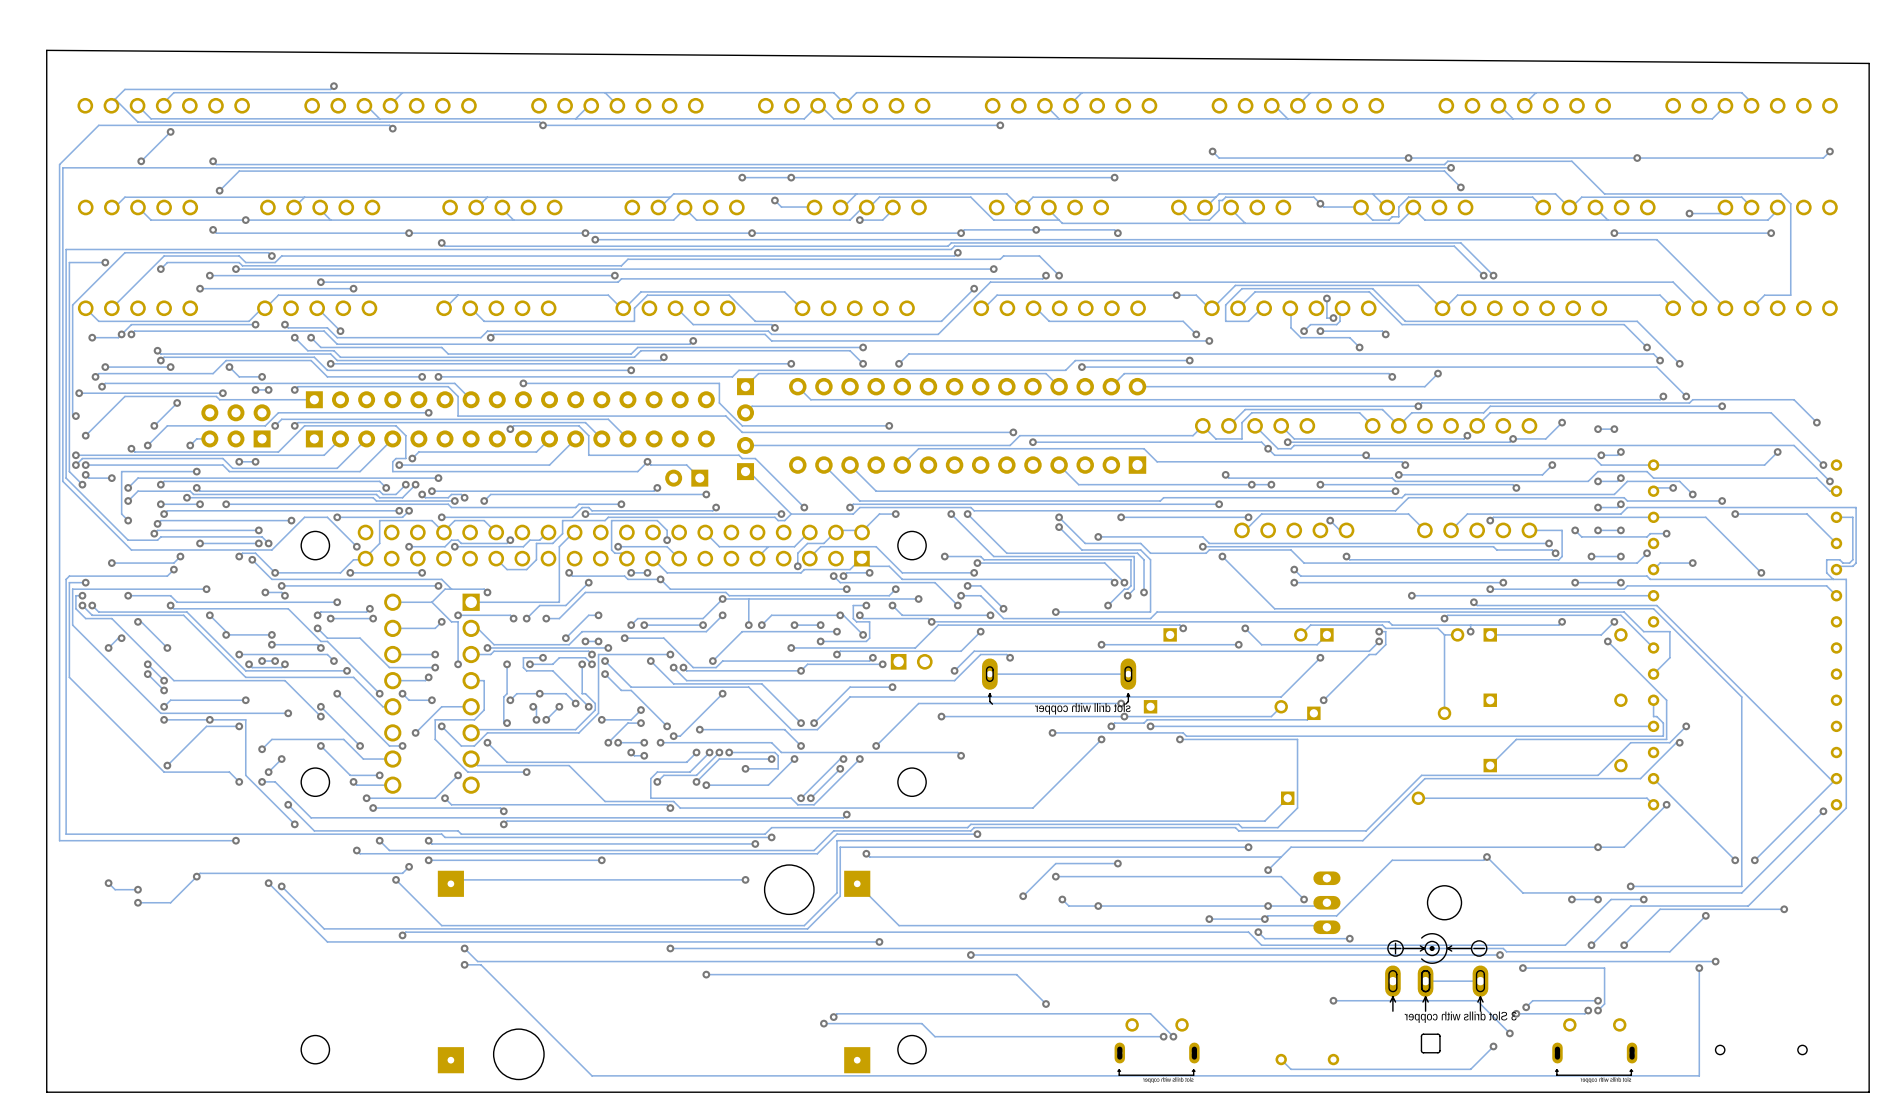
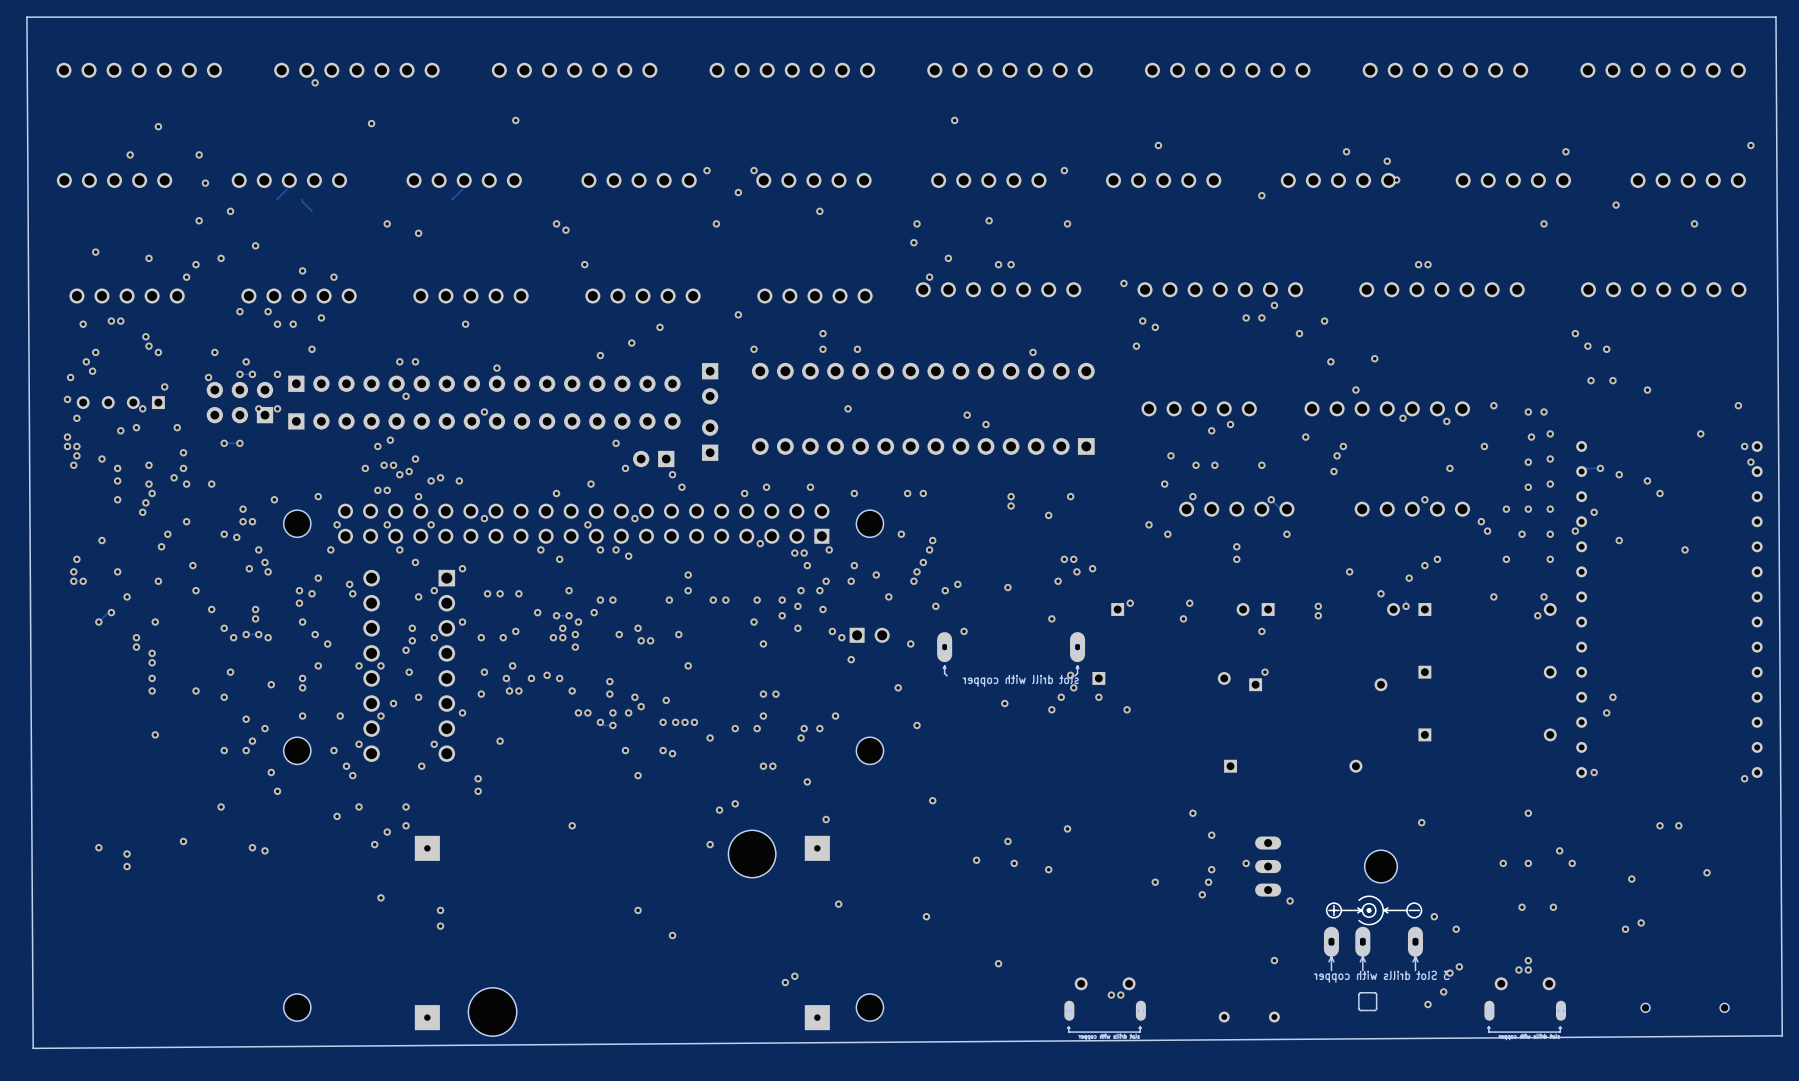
board edge: (46, 50) (46, 1092) (1869, 1092) (1869, 63) (46, 50) -> (1775, 17) (1782, 1035) (33, 1048) (26, 17) (1775, 17)
track: (333, 86) (330, 89) (124, 89) (111, 102) (111, 105) (115, 99) (137, 122) (539, 122) (543, 125) (1000, 125) -> none
track: (402, 92) (390, 105) -> none
track: (605, 92) (617, 105) -> none
track: (1081, 92) (1071, 105) -> none
track: (1310, 92) (1297, 105) -> none
track: (1535, 92) (1524, 105) -> none
part position: (163, 105) -> (139, 70)
track: (364, 105) (379, 118) -> none
part position: (390, 105) -> (356, 70)
track: (591, 105) (588, 105) (575, 118) -> none
part position: (617, 105) -> (574, 70)
part position: (844, 105) -> (792, 70)
track: (1044, 105) (1059, 118) -> none
part position: (1071, 105) -> (1010, 70)
track: (1271, 105) (1274, 105) (1287, 118) -> none
part position: (1297, 105) -> (1227, 70)
track: (1498, 105) (1513, 118) -> none
part position: (1524, 105) -> (1445, 70)
track: (1725, 105) (1712, 118) (833, 118) (820, 105) (818, 105) (804, 118) (151, 118) (137, 105) -> none
track: (1751, 105) (1751, 102) (1741, 92) (856, 92) (844, 105) (843, 102) (833, 92) (173, 92) (164, 102) (163, 105) -> none
part position: (1751, 105) -> (1663, 70)
track: (392, 128) (389, 125) (98, 125) (59, 164) (59, 840) (235, 840) -> none
track: (170, 131) (141, 161) -> none
track: (1829, 151) (1823, 158) (1219, 158) (1212, 151) -> none
track: (213, 161) (216, 164) (1444, 164) (1447, 161) (1571, 161) (1604, 193) (1780, 193) (1790, 203) (1790, 295) (1764, 295) (1751, 308) -> none
track: (1451, 167) (62, 167) (62, 481) (131, 549) (271, 549) (304, 517) (327, 517) (356, 546) -> none
track: (1114, 177) (742, 177) -> none
track: (1460, 187) (1444, 171) (239, 171) (219, 190) -> none
track: (856, 193) (843, 207) (840, 207) -> none
track: (1372, 193) (1387, 207) -> none
track: (670, 197) (124, 197) (115, 207) (111, 207) -> none
track: (1215, 197) (1032, 197) (1022, 207) (1019, 207) (1006, 193) (673, 193) (658, 207) -> none
track: (774, 200) (781, 207) (814, 207) -> none
track: (137, 207) (151, 220) (673, 220) (684, 207) (696, 220) (850, 220) (859, 210) (866, 210) (866, 207) (879, 197) (970, 197) (993, 220) (1059, 220) -> none
part position: (137, 207) -> (114, 180)
part position: (320, 207) -> (289, 180)
track: (502, 207) (513, 220) -> none
part position: (502, 207) -> (464, 180)
part position: (684, 207) -> (639, 180)
part position: (866, 207) -> (813, 180)
track: (892, 207) (882, 220) (859, 220) -> none
part position: (1048, 207) -> (988, 180)
track: (1231, 207) (1245, 223) -> none
part position: (1231, 207) -> (1163, 180)
part position: (1413, 207) -> (1338, 180)
track: (1543, 207) (1532, 197) (1408, 197) (1398, 207) (1398, 216) (1392, 216) (1388, 220) (1372, 220) (1359, 207) (1323, 207) (1313, 197) (1225, 197) (1219, 200) (1219, 210) (1209, 220) (1189, 220) (1178, 207) -> none
track: (1595, 207) (1607, 220) -> none
part position: (1595, 207) -> (1513, 180)
track: (1725, 207) (1722, 213) (1689, 213) -> none
track: (1751, 207) (1741, 197) (1581, 197) (1569, 207) (1555, 193) (1219, 193) (1204, 207) -> none
track: (1777, 207) (1777, 210) (1767, 220) (1424, 220) (1413, 207) (1398, 223) (1062, 223) (1049, 210) (1048, 207) -> none
part position: (1777, 207) -> (1688, 180)
track: (213, 229) (216, 233) (961, 233) (964, 229) (1114, 229) (1117, 233) -> none
track: (1771, 233) (1614, 233) -> none
track: (595, 239) (1656, 239) (1725, 308) -> none
track: (441, 242) (445, 246) (948, 246) (951, 242) (1460, 242) (1493, 275) -> none
track: (957, 252) (954, 256) (281, 256) (275, 262) (245, 262) (239, 256) (164, 256) (111, 308) -> none
track: (271, 256) (268, 252) (124, 252) (72, 305) (72, 416) (75, 416) -> none
track: (105, 262) (69, 262) (69, 471) (82, 484) -> none
track: (160, 269) (167, 262) (239, 262) (242, 265) (621, 265) (627, 259) (1000, 259) (1003, 256) (1039, 256) (1059, 275) -> none
track: (993, 269) (235, 269) -> none
track: (614, 275) (209, 275) -> none
track: (1046, 275) (1042, 278) (621, 278) (618, 282) (320, 282) -> none
track: (1483, 275) (1454, 246) (954, 246) (951, 249) (66, 249) (66, 478) (128, 540) (157, 540) (160, 536) (262, 536) (268, 543) -> none
track: (353, 288) (200, 288) -> none
track: (974, 288) (941, 321) (755, 321) (729, 295) (647, 295) (634, 308) (634, 321) (484, 321) (470, 308) -> none
track: (458, 295) (444, 308) -> none
track: (1326, 298) (1326, 318) (1333, 318) -> none
track: (317, 308) (340, 331) -> none
track: (675, 308) (693, 324) (771, 324) (774, 327) -> none
track: (802, 308) (784, 291) (641, 291) (624, 308) (621, 308) (608, 295) (278, 295) (249, 321) (98, 321) (85, 308) -> none
track: (1033, 308) (1036, 308) (1049, 321) (1183, 321) (1196, 334) -> none
part position: (1059, 308) -> (998, 289)
track: (1238, 308) (1255, 291) (1369, 291) (1402, 324) (1624, 324) (1647, 347) -> none
track: (1264, 308) (1261, 308) (1248, 321) (1225, 321) (1225, 305) (1242, 288) (1372, 288) (1405, 321) (1637, 321) (1679, 363) -> none
track: (1290, 308) (1291, 327) (1300, 337) (1349, 337) (1359, 347) -> none
part position: (1290, 308) -> (1220, 289)
track: (1342, 308) (1340, 308) (1340, 321) (1336, 324) (1310, 324) (1304, 331) -> none
part position: (1520, 308) -> (1441, 289)
track: (1673, 308) (1660, 295) (1457, 295) (1444, 308) (1441, 308) (1418, 285) (1235, 285) (1212, 308) (1209, 308) (1196, 295) (997, 295) (983, 308) (981, 308) -> none
track: (1699, 308) (1673, 282) (990, 282) (938, 334) (771, 334) (768, 331) (487, 331) (480, 337) (337, 337) (327, 327) (288, 327) (284, 324) -> none
part position: (1751, 308) -> (1663, 289)
track: (255, 324) (131, 324) (118, 337) (92, 337) -> none
track: (1320, 331) (1382, 331) (1385, 334) -> none
track: (131, 334) (134, 331) (324, 331) (337, 344) (689, 344) (693, 340) -> none
track: (294, 337) (307, 350) (333, 350) (340, 357) (634, 357) (641, 350) (850, 350) (863, 363) -> none
track: (311, 337) (320, 347) (441, 347) (448, 354) (631, 354) (637, 347) (863, 347) -> none
track: (490, 337) (494, 334) (765, 334) (771, 340) (1209, 340) -> none
track: (157, 350) (160, 354) (330, 354) (337, 360) (660, 360) (663, 357) -> none
track: (160, 360) (164, 357) (314, 357) (327, 370) (631, 370) -> none
track: (1189, 360) (1075, 360) (1065, 370) (738, 370) (732, 376) (438, 376) -> none
track: (1660, 360) (1653, 354) (908, 354) (899, 363) -> none
track: (791, 363) (330, 363) -> none
track: (170, 367) (105, 367) -> none
track: (229, 367) (239, 376) (262, 376) -> none
track: (1081, 367) (1656, 367) (1686, 396) -> none
track: (1437, 373) (1424, 386) (1137, 386) -> none
track: (422, 376) (327, 376) (311, 360) (226, 360) (213, 373) (98, 373) (95, 376) -> none
track: (1392, 376) (1388, 373) (1124, 373) (1111, 386) -> none
track: (523, 383) (719, 383) (719, 403) (742, 425) (889, 425) -> none
track: (102, 386) (105, 383) (454, 383) (471, 399) -> none
track: (797, 386) (810, 399) (1660, 399) (1663, 396) -> none
track: (1059, 386) (1046, 373) (758, 373) (745, 386) -> none
track: (294, 389) (298, 386) (448, 386) (458, 396) (458, 416) (725, 416) (742, 432) (1013, 432) -> none
track: (222, 393) (79, 393) -> none
track: (314, 399) (219, 399) (216, 396) (124, 396) (85, 435) -> none
track: (177, 403) (154, 425) -> none
track: (1722, 406) (1490, 406) (1483, 412) (1411, 412) (1398, 425) (1382, 409) (1245, 409) (1228, 425) -> none
track: (428, 412) (278, 412) (265, 425) (167, 425) (147, 445) -> none
track: (745, 412) (752, 406) (1418, 406) (1421, 403) (1689, 403) (1692, 399) (1794, 399) (1816, 422) -> none
part: none -> (120, 402)
track: (1562, 422) (1545, 438) (1513, 438) (1509, 442) (1287, 442) -> none
part position: (235, 425) -> (239, 402)
track: (275, 425) (281, 419) (608, 419) (627, 438) -> none
track: (294, 425) (298, 422) (585, 422) (601, 438) -> none
track: (1255, 425) (1277, 448) (1291, 448) (1294, 445) (1794, 445) (1829, 481) -> none
track: (1281, 425) (1294, 438) (1464, 438) (1467, 435) -> none
track: (1372, 425) (1359, 412) (1251, 412) (1242, 422) (1242, 438) (1215, 438) (1202, 425) (1193, 435) (1019, 435) (1010, 445) (745, 445) -> none
track: (1477, 425) (1490, 412) (1771, 412) (1823, 465) -> none
track: (510, 429) (513, 425) (578, 425) (588, 435) (588, 455) (738, 455) (742, 458) (755, 458) (804, 507) -> none
track: (1614, 429) (1598, 429) -> none
track: (209, 438) (196, 438) (190, 445) -> none
track: (340, 438) (324, 455) (75, 455) -> none
track: (366, 438) (337, 468) (232, 468) (222, 458) (82, 458) (75, 465) -> none
track: (392, 438) (360, 471) (229, 471) (222, 465) (85, 465) -> none
track: (549, 438) (536, 452) (418, 452) (412, 458) -> none
track: (575, 438) (549, 465) (399, 465) -> none
track: (1032, 442) (1261, 442) (1274, 455) (1366, 455) (1369, 458) (1594, 458) (1601, 465) (1764, 465) (1777, 452) -> none
track: (131, 448) (134, 452) (278, 452) (304, 425) (396, 425) (405, 435) (405, 458) (396, 458) (392, 461) (392, 471) (637, 471) (647, 461) (650, 465) (686, 465) (699, 478) -> none
track: (1620, 452) (1617, 455) (1601, 455) -> none
track: (823, 465) (859, 500) (1160, 500) (1163, 497) (1402, 497) (1405, 494) (1614, 494) (1627, 481) (1679, 481) (1692, 494) -> none
track: (850, 465) (876, 491) (1395, 491) -> none
track: (1059, 465) (1078, 484) (1271, 484) -> none
track: (1405, 465) (1402, 461) (1157, 461) (1144, 448) (918, 448) (902, 465) -> none
track: (1552, 465) (1542, 474) (1398, 474) -> none
track: (196, 471) (121, 471) (121, 514) (128, 520) -> none
track: (745, 471) (748, 471) (791, 514) -> none
track: (85, 474) (88, 478) (111, 478) -> none
track: (1225, 474) (1228, 478) (1392, 478) (1395, 481) (1588, 481) (1598, 471) (1647, 471) (1653, 478) (1816, 478) (1829, 491) (1836, 491) -> none
track: (438, 478) (137, 478) (128, 487) -> none
track: (1620, 478) (1617, 481) (1598, 481) -> none
track: (160, 484) (164, 481) (379, 481) (386, 487) -> none
track: (405, 484) (396, 494) (382, 494) (379, 491) (200, 491) (196, 487) -> none
track: (415, 484) (402, 497) (379, 497) (376, 494) (193, 494) (190, 491) (137, 491) (128, 500) -> none
track: (1320, 484) (1513, 484) (1516, 487) -> none
track: (657, 487) (654, 491) (431, 491) -> none
track: (422, 494) (425, 497) (448, 497) (451, 494) (461, 494) (464, 497) -> none
track: (706, 494) (490, 494) (484, 500) -> none
track: (186, 497) (373, 497) (376, 500) (454, 500) -> none
track: (1722, 500) (1627, 500) (1624, 497) (1408, 497) (1395, 510) (974, 510) (970, 507) (859, 507) (853, 514) (791, 514) -> none
track: (200, 504) (160, 504) -> none
track: (621, 504) (578, 504) (575, 507) (451, 507) (448, 504) (226, 504) -> none
track: (1219, 504) (853, 504) (850, 507) -> none
track: (1620, 504) (1617, 507) (1598, 507) -> none
track: (716, 507) (712, 510) (592, 510) (588, 507) (582, 507) (572, 517) (441, 517) -> none
track: (399, 510) (167, 510) (164, 514) -> none
track: (409, 510) (402, 517) (337, 517) -> none
track: (781, 514) (585, 514) -> none
track: (791, 514) (784, 520) (778, 520) (774, 517) (608, 517) (605, 520) (562, 520) (562, 533) (552, 543) (536, 543) (536, 559) (526, 569) (507, 569) (496, 558) -> none
track: (895, 514) (879, 514) (862, 532) (859, 530) (836, 530) (823, 543) (807, 543) (797, 553) (797, 566) -> none
track: (951, 514) (993, 556) (1134, 556) (1134, 589) (1127, 595) -> none
track: (967, 514) (1006, 553) (1137, 553) (1144, 559) (1144, 592) -> none
track: (1735, 514) (1807, 514) (1836, 543) -> none
track: (1059, 517) (1085, 543) (1140, 543) (1150, 553) (1206, 553) (1209, 549) (1291, 549) (1304, 563) (1637, 563) (1647, 553) -> none
track: (1248, 517) (1121, 517) -> none
track: (1836, 517) (1852, 517) (1852, 559) (1849, 563) (1843, 563) (1839, 559) (1826, 559) (1826, 572) (1833, 579) -> none
track: (291, 520) (160, 520) (157, 523) -> none
track: (1490, 520) (1493, 517) (1705, 517) (1761, 572) -> none
track: (1059, 527) (1081, 549) (1140, 549) (1150, 559) (1150, 612) (1055, 612) -> none
track: (258, 530) (157, 530) (154, 533) -> none
track: (1424, 530) (1408, 514) (1261, 514) (1245, 530) (1242, 530) -> none
track: (1451, 530) (1467, 514) (1620, 514) (1627, 507) (1856, 507) (1856, 563) (1852, 566) (1839, 566) (1836, 569) -> none
track: (1529, 530) (1562, 530) (1562, 556) (1558, 559) (1349, 559) (1346, 556) -> none
track: (1575, 530) (1581, 536) (1647, 536) (1650, 533) (1666, 533) -> none
track: (1620, 530) (1598, 530) -> none
track: (496, 532) (484, 520) (454, 520) (443, 532) (431, 520) (379, 520) (379, 543) (365, 558) (353, 559) (340, 572) (275, 572) (255, 553) (242, 553) (239, 556) -> none
track: (548, 532) (539, 540) (529, 540) (523, 546) (454, 546) -> none
track: (574, 532) (559, 546) (559, 602) (471, 602) -> none
track: (809, 532) (794, 546) (719, 546) (705, 532) -> none
track: (1098, 536) (1202, 536) (1209, 543) (1549, 543) -> none
track: (510, 540) (507, 543) (461, 543) (458, 540) (451, 540) (445, 546) (409, 546) -> none
track: (667, 540) (667, 530) (657, 520) (611, 520) (611, 549) (614, 553) (621, 553) (626, 558) -> none
track: (258, 543) (200, 543) -> none
track: (618, 546) (667, 546) (679, 558) -> none
track: (768, 546) (757, 558) -> none
track: (1202, 546) (1493, 546) (1496, 549) (1552, 549) (1555, 553) -> none
track: (180, 556) (173, 563) (111, 563) -> none
track: (944, 556) (980, 556) (983, 559) (1130, 559) (1130, 585) (1124, 589) (1108, 605) -> none
track: (1222, 556) (1274, 608) (1653, 608) (1741, 696) (1741, 886) (1630, 886) -> none
track: (1620, 556) (1591, 556) -> none
track: (653, 558) (667, 572) (801, 572) (804, 569) (850, 569) (861, 558) (869, 566) (889, 566) (902, 579) (1111, 579) (1114, 582) -> none
track: (809, 558) (820, 546) (876, 546) (902, 572) (974, 572) -> none
track: (252, 559) (271, 579) (441, 579) (451, 589) -> none
track: (977, 563) (1104, 563) (1124, 582) -> none
track: (1692, 563) (1660, 563) (1653, 569) -> none
track: (173, 569) (167, 576) (69, 576) (66, 579) (66, 834) (441, 834) (445, 837) (771, 837) -> none
track: (1294, 569) (1300, 576) (1647, 576) (1650, 579) (1846, 579) (1846, 808) (1748, 906) (1630, 906) (1591, 945) -> none
track: (422, 572) (350, 572) -> none
track: (569, 572) (572, 576) (624, 576) (627, 579) (660, 579) (670, 589) (846, 589) -> none
track: (647, 572) (631, 572) -> none
track: (869, 572) (846, 572) (843, 576) -> none
track: (833, 576) (840, 582) (934, 582) (957, 605) -> none
track: (85, 582) (69, 582) (69, 677) (164, 772) (229, 772) (239, 781) -> none
track: (588, 582) (565, 605) (539, 605) (526, 618) -> none
track: (1503, 582) (1294, 582) -> none
track: (1620, 582) (1575, 582) -> none
track: (438, 585) (281, 585) -> none
track: (967, 585) (980, 585) (1003, 608) -> none
track: (206, 589) (72, 589) (72, 625) (160, 713) (288, 713) -> none
track: (895, 589) (889, 595) (729, 595) (725, 592) (585, 592) (559, 618) (546, 618) -> none
track: (1490, 589) (1624, 589) (1627, 585) (1826, 585) (1836, 595) -> none
track: (265, 592) (281, 592) (284, 595) -> none
track: (487, 592) (484, 589) (445, 589) (431, 602) -> none
track: (82, 595) (75, 595) (75, 608) (85, 618) (111, 618) (173, 680) (284, 680) (320, 716) -> none
track: (128, 595) (170, 595) (177, 602) (337, 602) -> none
track: (961, 595) (980, 595) (1003, 618) (1150, 618) (1157, 612) (1624, 612) (1643, 631) (1669, 631) (1669, 657) (1653, 674) -> none
track: (1653, 595) (1411, 595) -> none
track: (748, 598) (748, 625) -> none
track: (918, 598) (722, 598) (703, 618) (637, 618) (631, 625) -> none
track: (431, 602) (392, 602) -> none
track: (431, 602) (451, 621) (458, 621) (458, 664) -> none
track: (1473, 602) (1477, 605) (1656, 605) (1833, 781) -> none
track: (82, 605) (92, 615) (183, 615) (245, 677) (353, 677) (382, 706) (392, 706) -> none
track: (92, 605) (98, 612) (186, 612) (245, 670) (347, 670) -> none
track: (170, 605) (173, 608) (288, 608) (320, 641) (327, 641) (379, 693) -> none
track: (866, 605) (853, 605) (853, 618) (856, 621) (869, 621) (869, 638) (866, 641) (820, 641) -> none
track: (892, 605) (902, 615) (990, 615) -> none
track: (369, 608) (366, 612) (320, 612) (317, 615) -> none
track: (209, 615) (229, 634) -> none
track: (458, 615) (510, 615) (513, 618) -> none
track: (598, 615) (588, 615) (565, 638) -> none
track: (722, 615) (706, 631) (582, 631) (569, 644) (494, 644) (477, 628) (471, 628) -> none
track: (859, 615) (863, 618) (928, 618) (931, 621) (1388, 621) (1392, 625) (1558, 625) (1562, 621) -> none
track: (373, 618) (330, 618) -> none
track: (1444, 618) (1447, 615) (1620, 615) (1653, 647) -> none
track: (137, 621) (141, 621) (167, 647) -> none
track: (441, 621) (435, 628) (392, 628) -> none
track: (1614, 621) (1601, 634) (1490, 634) -> none
track: (703, 625) (644, 625) -> none
track: (761, 625) (771, 615) (843, 615) (863, 634) -> none
track: (820, 625) (794, 625) -> none
track: (317, 628) (327, 638) (360, 638) (389, 667) (435, 667) -> none
track: (1183, 628) (1179, 625) (938, 625) (915, 647) (791, 647) -> none
track: (1245, 628) (1261, 644) (1317, 644) (1326, 634) -> none
track: (836, 631) (742, 631) (712, 661) -> none
track: (980, 631) (961, 651) (840, 651) (836, 654) -> none
track: (1379, 631) (1385, 631) (1385, 644) (1375, 654) (1369, 654) (1323, 700) -> none
track: (271, 634) (226, 634) -> none
track: (1444, 634) (1444, 713) -> none
track: (1444, 634) (1437, 628) (1385, 628) (1382, 625) (1310, 625) (1300, 634) -> none
track: (1457, 634) (1444, 634) -> none
track: (624, 638) (663, 638) (693, 667) (716, 667) (722, 661) (869, 661) (872, 657) -> none
track: (1379, 641) (1369, 651) (974, 651) (954, 670) -> none
track: (1607, 641) (1666, 700) (1666, 739) (1516, 739) (1490, 765) -> none
track: (271, 644) (317, 644) (320, 647) -> none
track: (1238, 644) (1101, 644) -> none
track: (608, 647) (487, 647) -> none
track: (239, 654) (327, 654) (333, 661) -> none
track: (435, 654) (392, 654) -> none
track: (592, 654) (588, 651) (494, 651) (490, 654) (471, 654) -> none
track: (670, 654) (598, 654) (598, 713) (578, 732) (487, 732) (474, 745) (461, 745) (441, 726) -> none
track: (543, 657) (523, 657) (523, 667) (526, 670) (552, 670) (588, 706) -> none
track: (1010, 657) (1006, 654) (980, 654) (954, 680) (686, 680) (673, 667) -> none
track: (1320, 657) (1281, 696) (850, 696) (817, 729) (791, 729) (748, 687) (631, 687) (605, 661) -> none
track: (650, 661) (673, 683) (761, 683) (801, 723) -> none
track: (147, 664) (164, 680) -> none
track: (284, 664) (281, 667) (252, 667) (249, 664) -> none
track: (507, 664) (507, 693) (503, 696) (503, 723) (507, 723) -> none
track: (582, 664) (582, 693) (585, 693) (595, 703) (595, 710) (575, 729) (474, 729) (471, 732) -> none
track: (592, 664) (585, 657) (559, 657) (552, 664) (529, 664) -> none
track: (882, 664) (807, 664) (801, 670) (686, 670) (683, 667) -> none
track: (147, 674) (164, 690) -> none
track: (605, 674) (621, 690) (631, 690) (667, 726) -> none
track: (1128, 674) (989, 674) -> none
track: (428, 677) (425, 680) (392, 680) -> none
track: (471, 680) (484, 680) (484, 710) (474, 719) (435, 719) (435, 739) (467, 772) (526, 772) -> none
track: (892, 687) (850, 687) (814, 723) -> none
track: (337, 693) (389, 745) (402, 745) -> none
track: (402, 693) (409, 700) (431, 700) -> none
track: (722, 693) (680, 736) (673, 736) -> none
track: (245, 700) (170, 700) (164, 706) -> none
track: (510, 700) (516, 693) (565, 693) (575, 703) -> none
track: (1653, 700) (1653, 716) (1656, 716) (1663, 723) (1663, 736) (1186, 736) (1183, 732) (1052, 732) -> none
track: (1121, 703) (918, 703) (876, 745) -> none
track: (320, 706) (360, 745) -> none
track: (471, 706) (441, 706) (415, 732) -> none
track: (559, 706) (546, 719) -> none
track: (1281, 706) (1271, 716) (941, 716) -> none
track: (641, 710) (631, 719) (601, 719) -> none
track: (1313, 713) (1307, 719) (1147, 719) (1144, 723) (1114, 723) (1111, 726) -> none
track: (164, 719) (245, 719) (245, 775) (294, 824) -> none
track: (641, 723) (627, 723) (608, 742) -> none
track: (239, 726) (206, 726) (167, 765) -> none
track: (1653, 726) (1150, 726) -> none
track: (1686, 726) (1669, 742) (1630, 742) (1598, 775) (1421, 775) (1366, 830) (1238, 830) (1235, 827) (974, 827) (970, 830) (833, 830) (814, 850) (389, 850) (379, 840) -> none
track: (699, 729) (784, 729) (801, 745) -> none
track: (1101, 739) (1032, 808) (680, 808) (673, 801) (605, 801) (569, 765) (477, 765) (471, 759) -> none
track: (1179, 739) (1297, 739) (1297, 808) (1277, 827) (1242, 827) (1238, 824) (970, 824) (967, 827) (771, 827) (765, 834) (461, 834) (458, 830) (314, 830) (288, 804) -> none
track: (487, 742) (507, 762) (686, 762) (696, 752) -> none
track: (644, 742) (618, 742) -> none
track: (660, 742) (771, 742) (781, 752) (957, 752) (961, 755) -> none
track: (1679, 742) (1676, 742) (1640, 778) (1424, 778) (1362, 840) (836, 840) (836, 892) (804, 925) (441, 925) (396, 879) -> none
track: (320, 745) (350, 775) (379, 775) -> none
track: (262, 749) (271, 739) (343, 739) (363, 759) (392, 759) -> none
track: (709, 752) (689, 772) (657, 772) (650, 778) (650, 798) (791, 798) (797, 804) (814, 804) (859, 759) -> none
track: (719, 752) (696, 775) (663, 775) (657, 781) -> none
track: (729, 752) (774, 752) (778, 755) (778, 768) (745, 768) -> none
track: (281, 759) (268, 772) -> none
track: (771, 759) (719, 759) (696, 781) -> none
track: (794, 759) (768, 785) (706, 785) -> none
track: (843, 759) (840, 759) (801, 798) -> none
track: (840, 768) (810, 798) -> none
track: (458, 775) (435, 798) (366, 798) -> none
track: (1653, 778) (1735, 860) -> none
track: (1836, 778) (1754, 860) -> none
track: (262, 781) (275, 781) (311, 817) (843, 817) (846, 814) -> none
track: (353, 781) (356, 785) (392, 785) -> none
track: (445, 798) (451, 804) (667, 804) (670, 808) -> none
track: (1287, 798) (1264, 821) (507, 821) (503, 824) -> none
track: (1418, 798) (1647, 798) (1653, 804) -> none
track: (1666, 804) (1624, 847) (1291, 847) (1268, 870) -> none
track: (373, 808) (500, 808) (503, 811) -> none
track: (1823, 811) (1741, 892) (1522, 892) (1486, 857) (1483, 860) (1392, 860) (1336, 915) (1268, 915) (1264, 919) (1209, 919) -> none
track: (977, 834) (836, 834) (817, 853) (360, 853) (356, 850) -> none
track: (428, 840) (431, 843) (755, 843) -> none
track: (1248, 847) (840, 847) (840, 896) (807, 928) (324, 928) (281, 886) -> none
track: (866, 853) (869, 857) (1281, 857) -> none
track: (601, 860) (428, 860) -> none
track: (1117, 863) (1055, 863) (1023, 896) -> none
track: (409, 866) (402, 873) (200, 873) (170, 902) (137, 902) -> none
track: (1055, 876) (1281, 876) (1304, 899) -> none
track: (745, 879) (454, 879) (450, 883) -> none
track: (108, 883) (115, 889) (137, 889) -> none
track: (268, 883) (327, 941) (879, 941) -> none
track: (857, 883) (899, 925) (1326, 925) (1326, 927) -> none
track: (1062, 899) (1068, 906) (1323, 906) (1326, 902) -> none
track: (1598, 899) (1571, 899) -> none
track: (1643, 899) (1611, 899) (1565, 945) (1261, 945) (1248, 932) (405, 932) (402, 935) -> none
track: (1784, 909) (1660, 909) (1624, 945) -> none
track: (1705, 915) (1669, 951) (1506, 951) (1503, 948) (670, 948) -> none
track: (1258, 932) (1264, 938) (1349, 938) -> none
track: (464, 948) (477, 961) (1715, 961) -> none
track: (1500, 955) (970, 955) -> none
track: (464, 964) (480, 964) (592, 1075) (1699, 1075) (1699, 968) -> none
track: (1522, 968) (1604, 968) (1604, 1004) (1598, 1010) -> none
track: (706, 974) (1016, 974) (1046, 1004) -> none
track: (1480, 981) (1425, 981) -> none
track: (1333, 1000) (1477, 1000) (1509, 1033) -> none
track: (1598, 1000) (1532, 1000) (1526, 1007) -> none
track: (1588, 1010) (1584, 1013) (1516, 1013) -> none
track: (833, 1017) (836, 1013) (1150, 1013) (1173, 1036) -> none
track: (823, 1023) (921, 1023) (934, 1036) (1163, 1036) -> none
track: (1493, 1046) (1470, 1069) (1291, 1069) (1281, 1059) -> none

